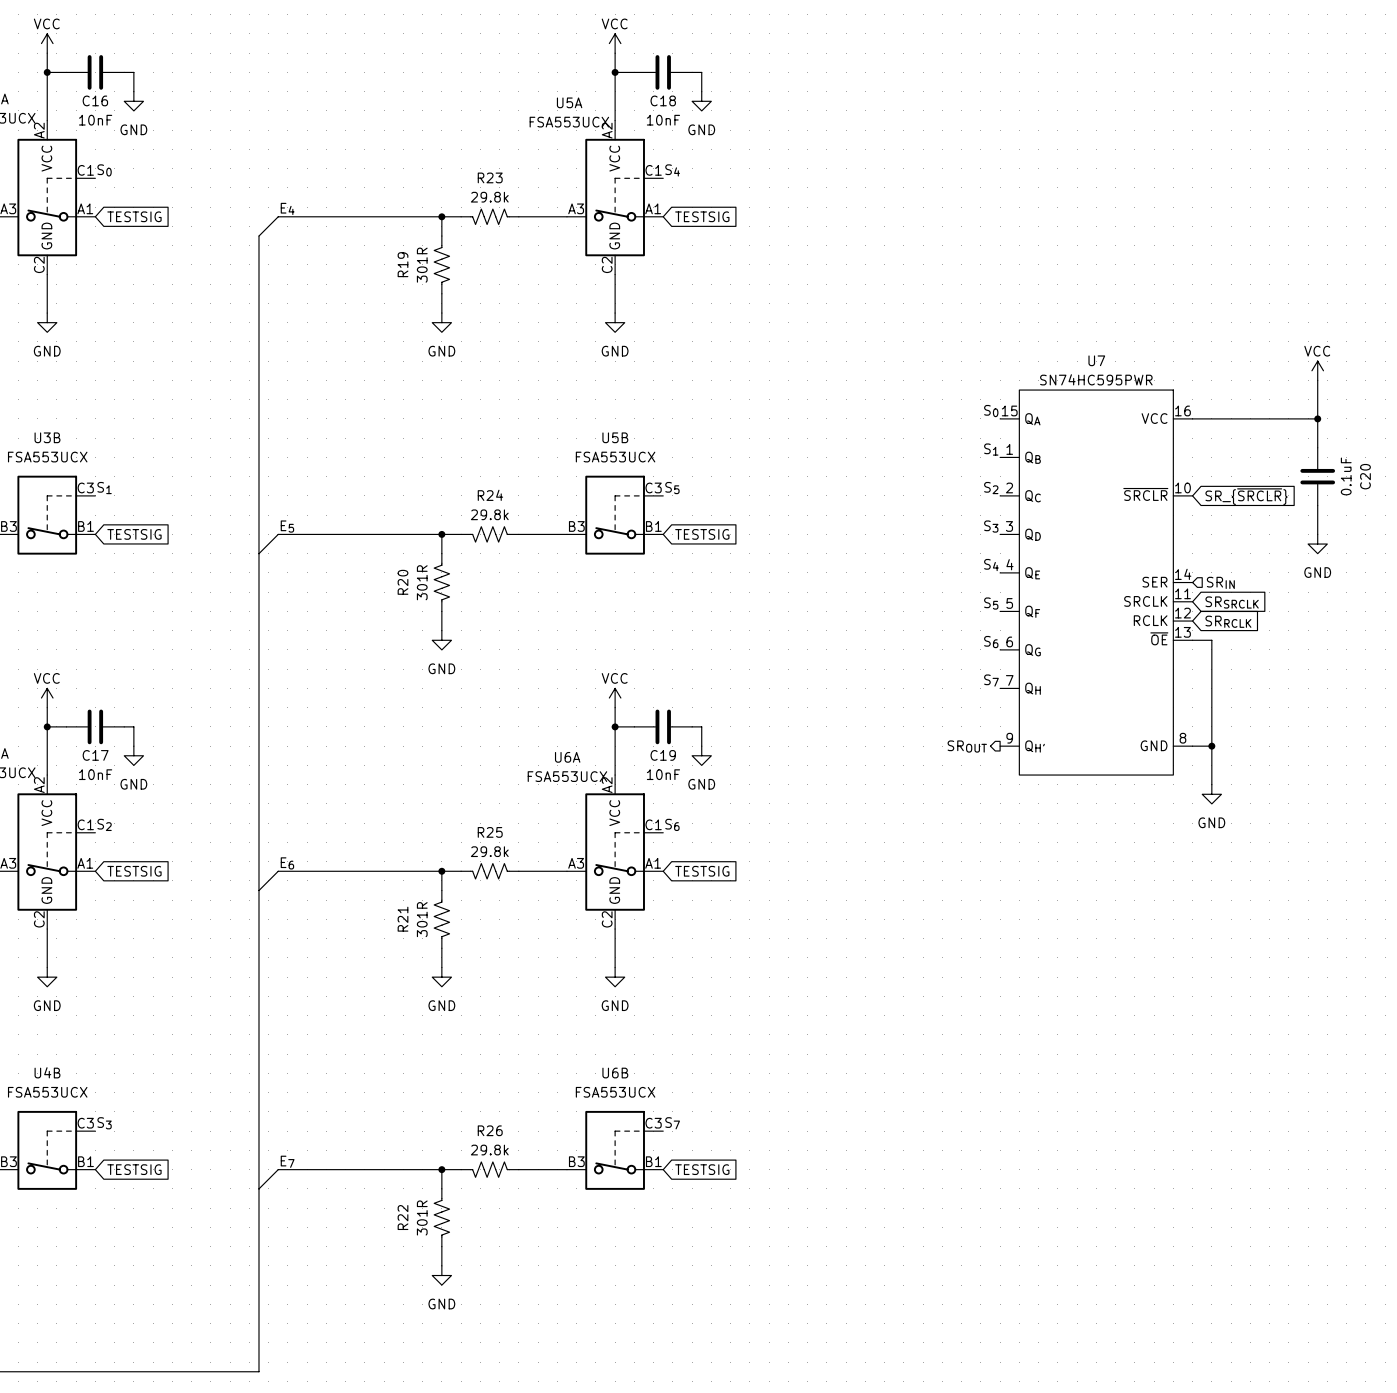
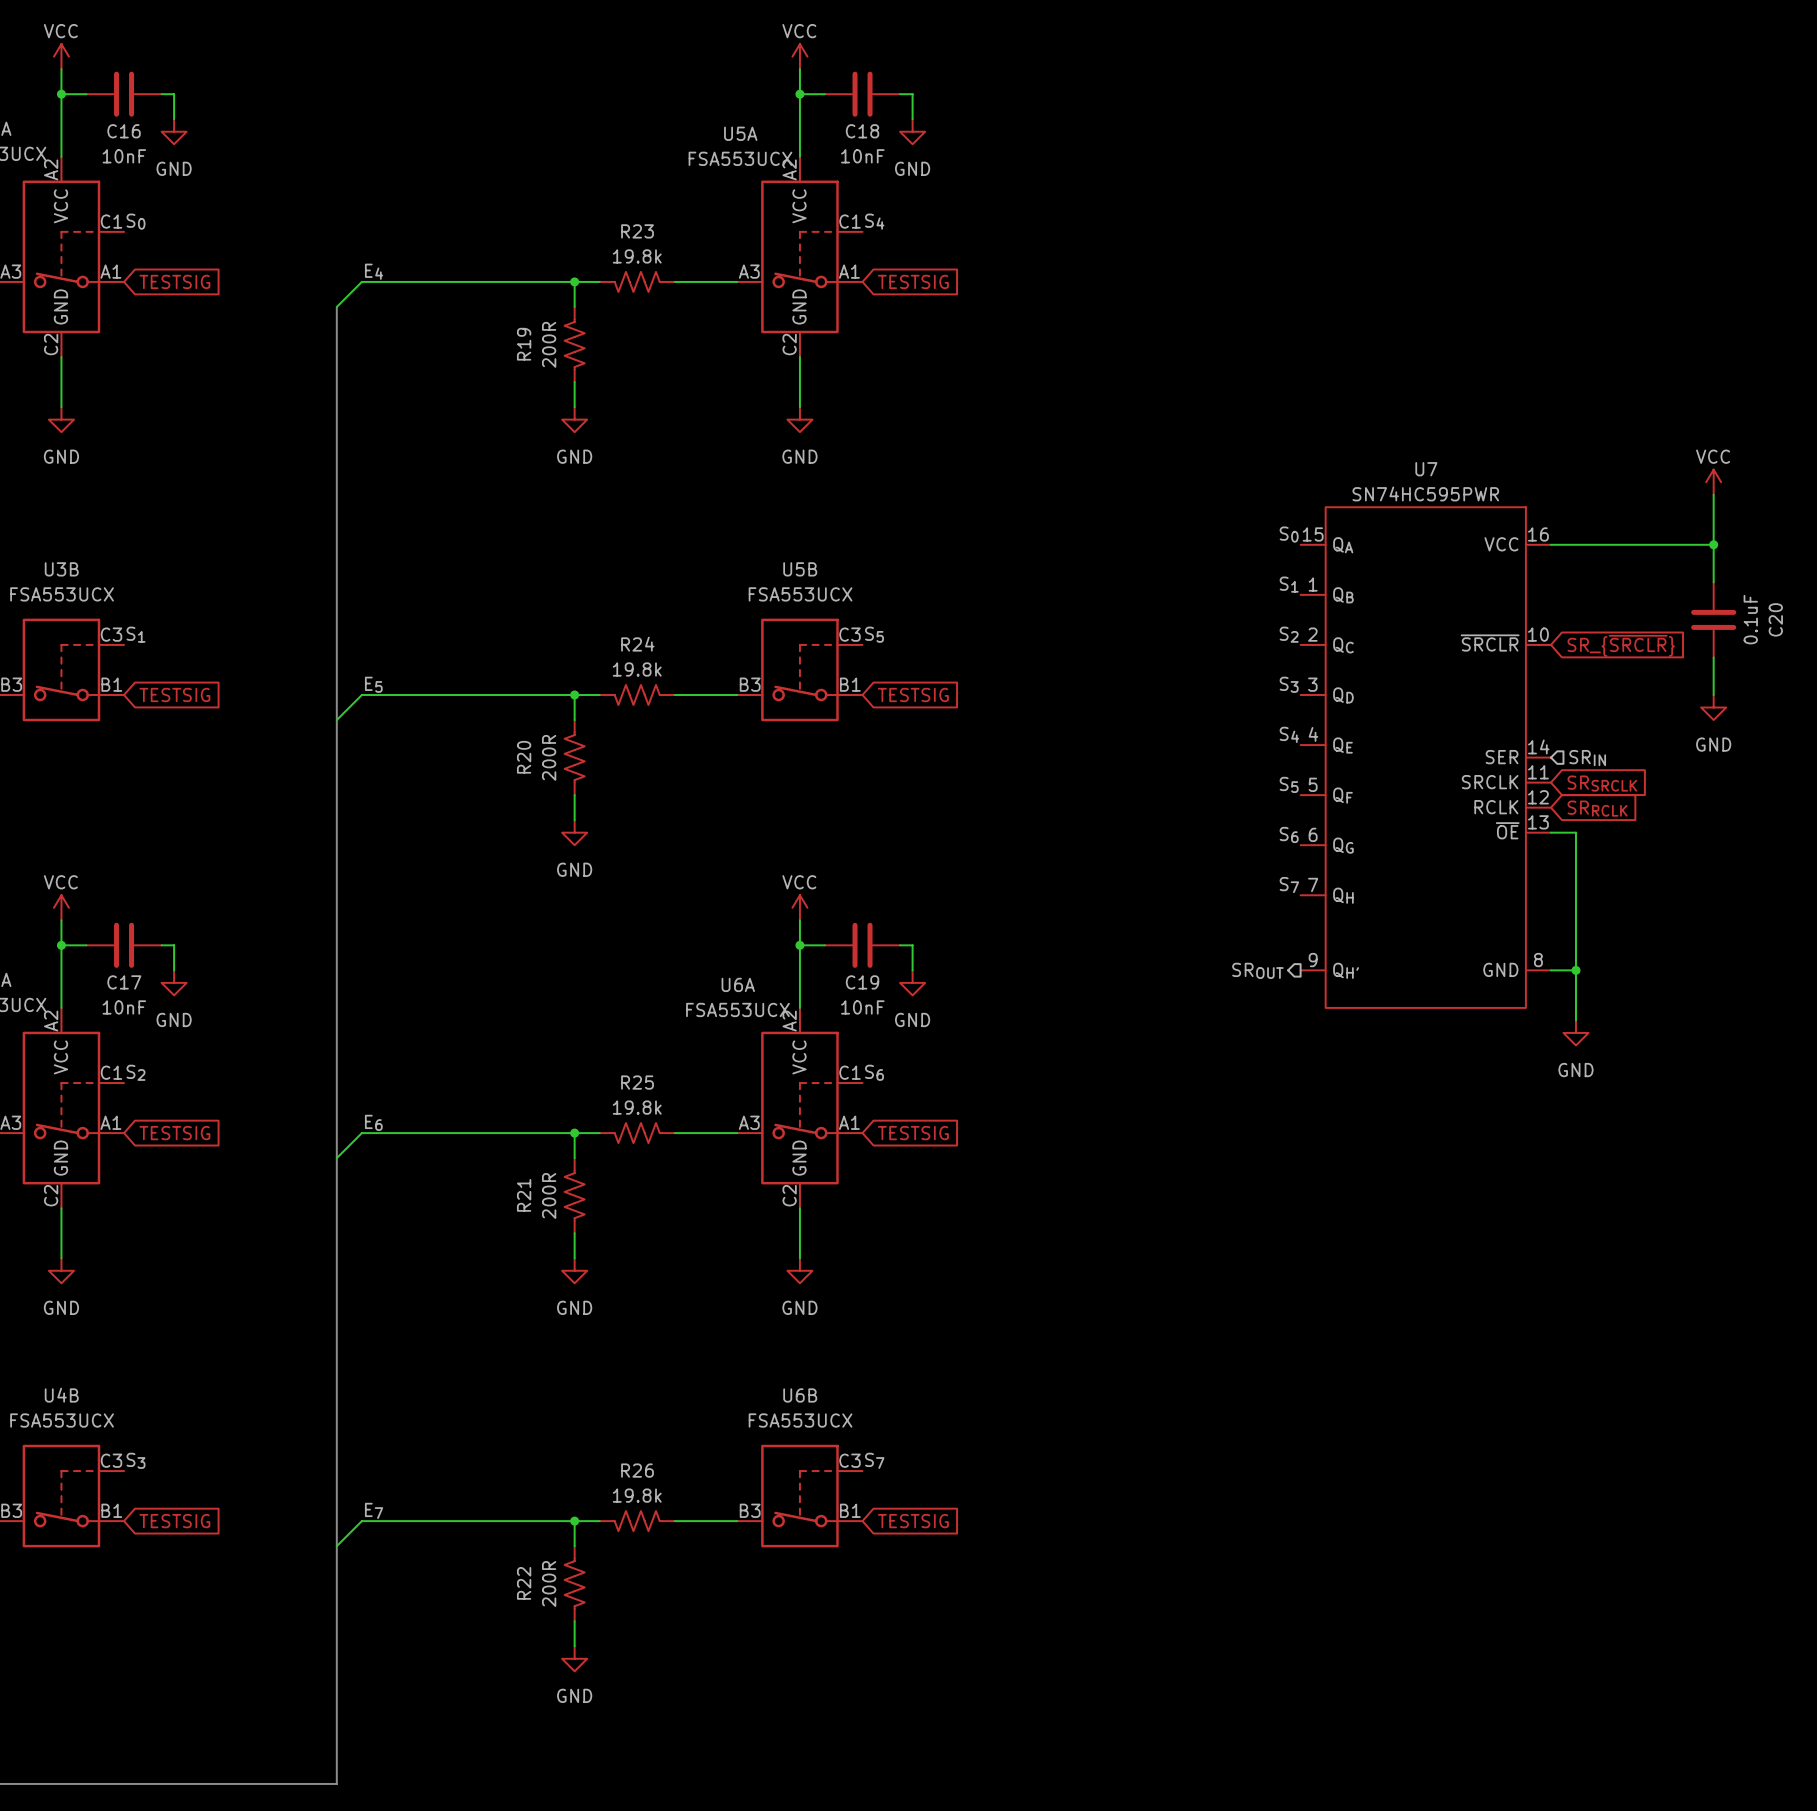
R23 value: 29.8k (489, 197) -> 19.8k (637, 256)
R19 value: 301R (422, 265) -> 200R (549, 344)
R24 value: 29.8k (489, 514) -> 19.8k (637, 669)
R20 value: 301R (422, 582) -> 200R (549, 757)
R25 value: 29.8k (489, 851) -> 19.8k (637, 1107)
R21 value: 301R (422, 919) -> 200R (549, 1195)
R26 value: 29.8k (489, 1150) -> 19.8k (637, 1495)
R22 value: 301R (422, 1217) -> 200R (549, 1583)

